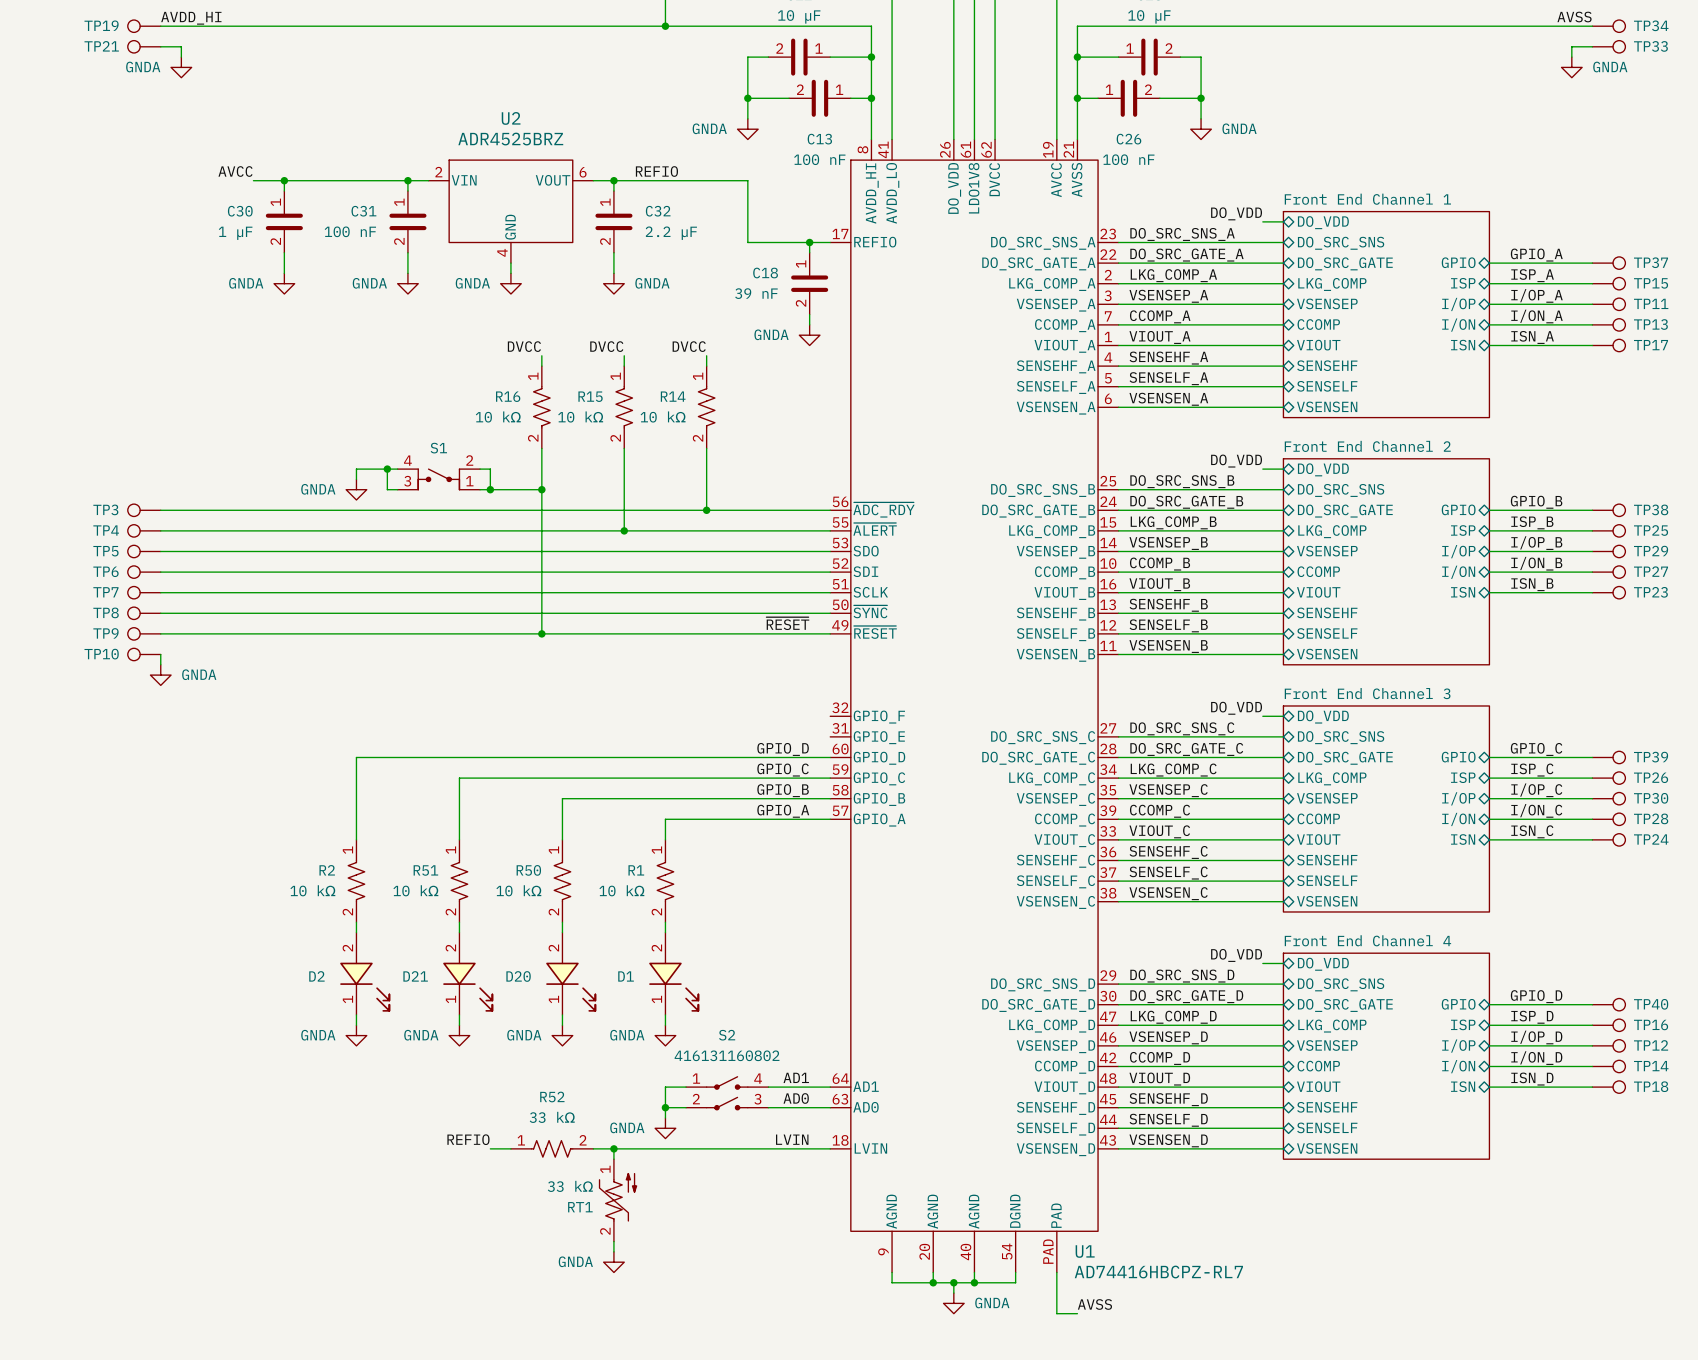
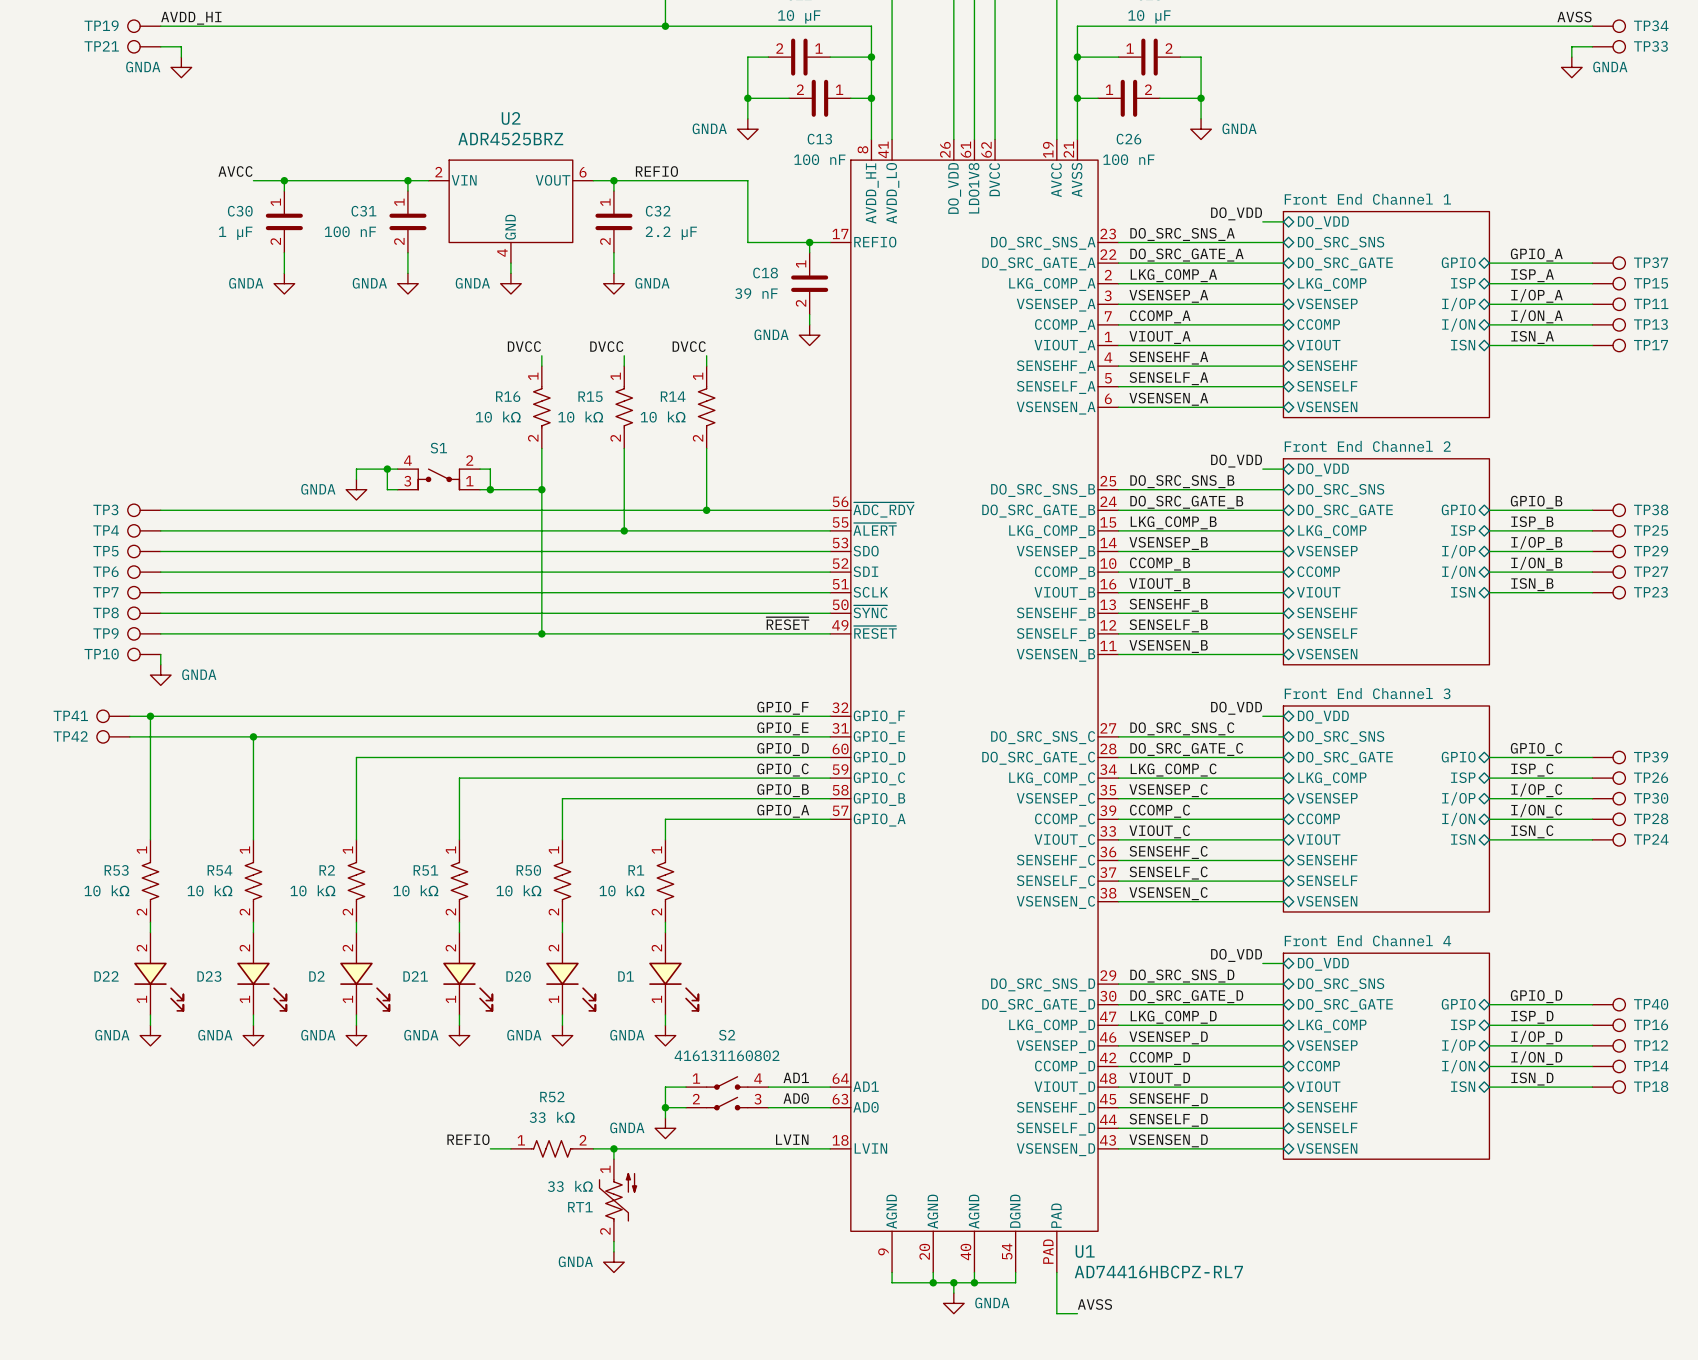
label: none -> GPIO_F (782, 708)
TP41: none -> (113, 716)
wire: none -> (129, 716) (830, 716)
wire: none -> (150, 716) (150, 839)
junction: none -> (150, 716)
label: none -> GPIO_E (782, 728)
TP42: none -> (113, 736)
wire: none -> (129, 736) (830, 736)
wire: none -> (253, 736) (253, 839)
junction: none -> (253, 736)
R53: none -> 10 kΩ (150, 881)
R54: none -> 10 kΩ (253, 881)
wire: none -> (150, 922) (150, 932)
wire: none -> (253, 922) (253, 932)
D22: none -> (159, 973)
D23: none -> (262, 973)
wire: none -> (150, 1014) (150, 1025)
wire: none -> (253, 1014) (253, 1025)
power symbol: none -> GNDA (150, 1035)
power symbol: none -> GNDA (253, 1035)

